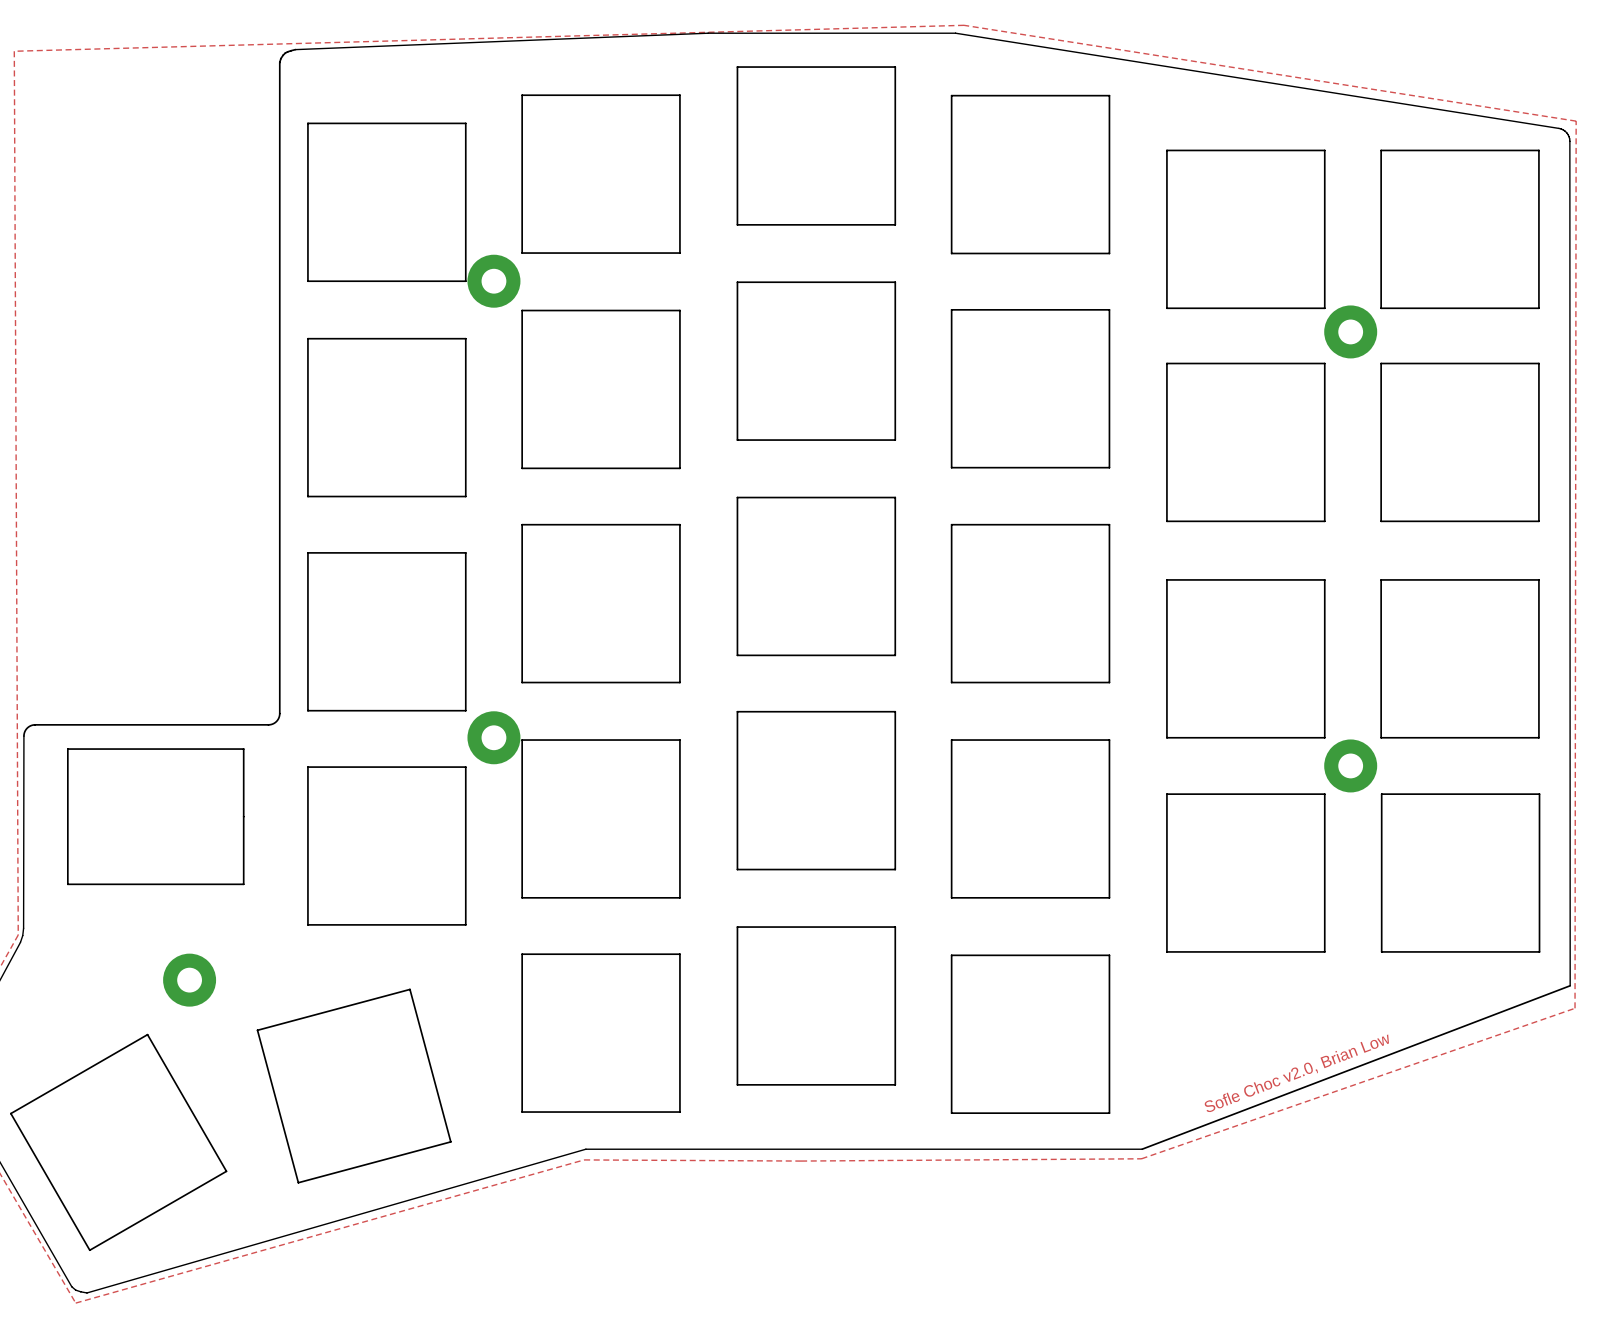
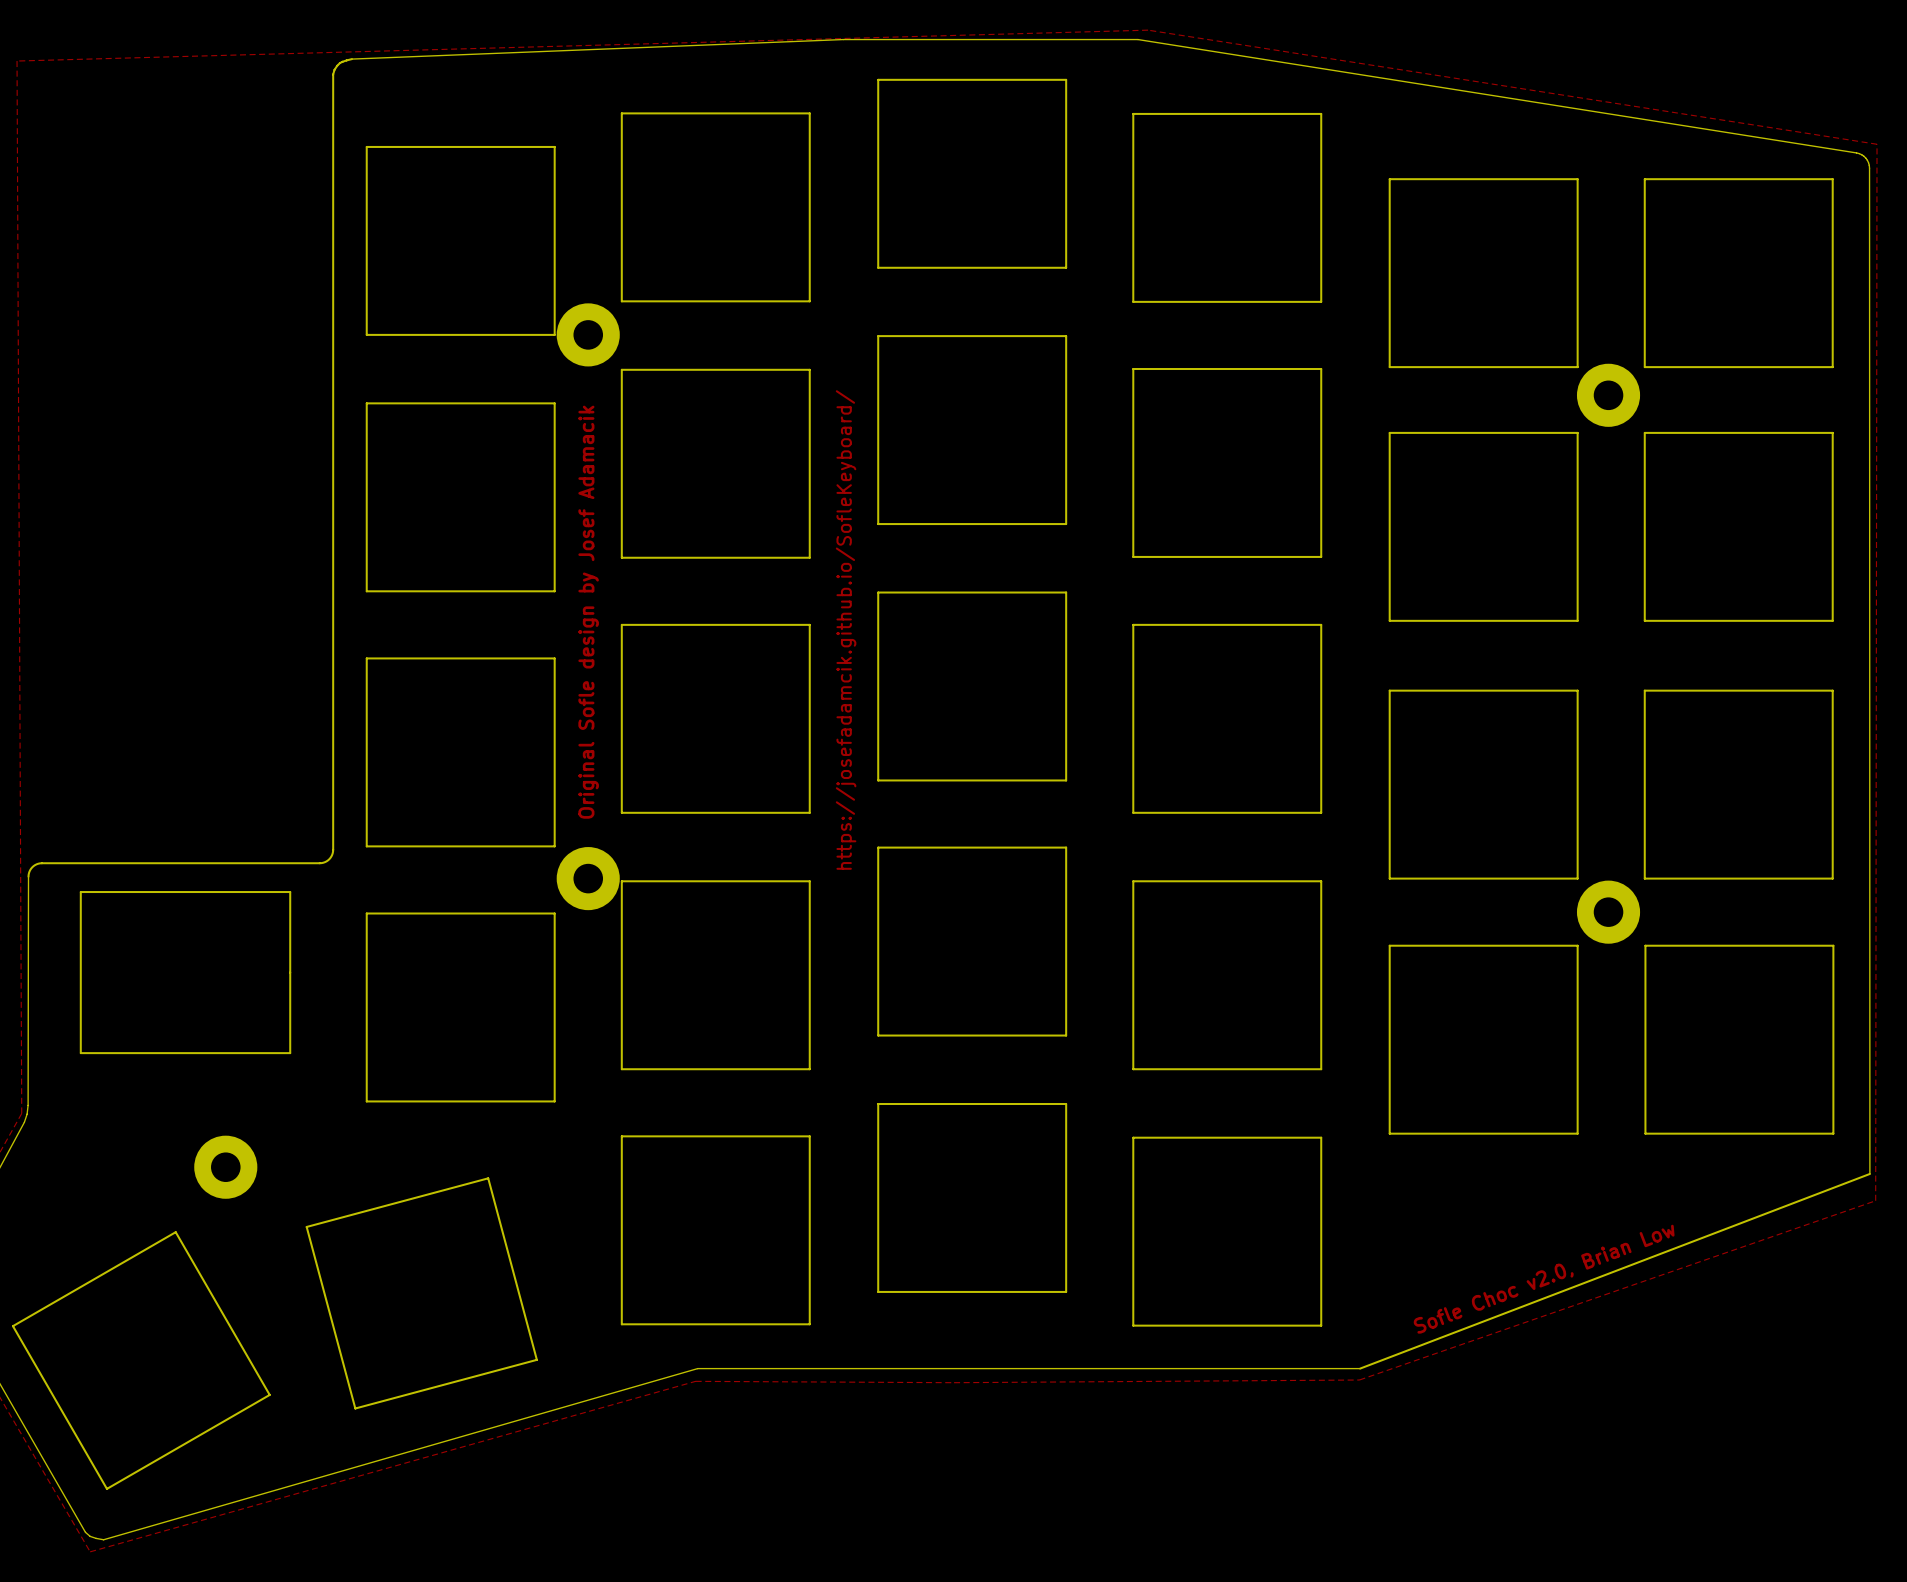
text: none -> Original Sofle design by Josef Adamacik (588, 612)
text: none -> https://josefadamcik.github.io/SofleKeyboard/ (846, 630)

